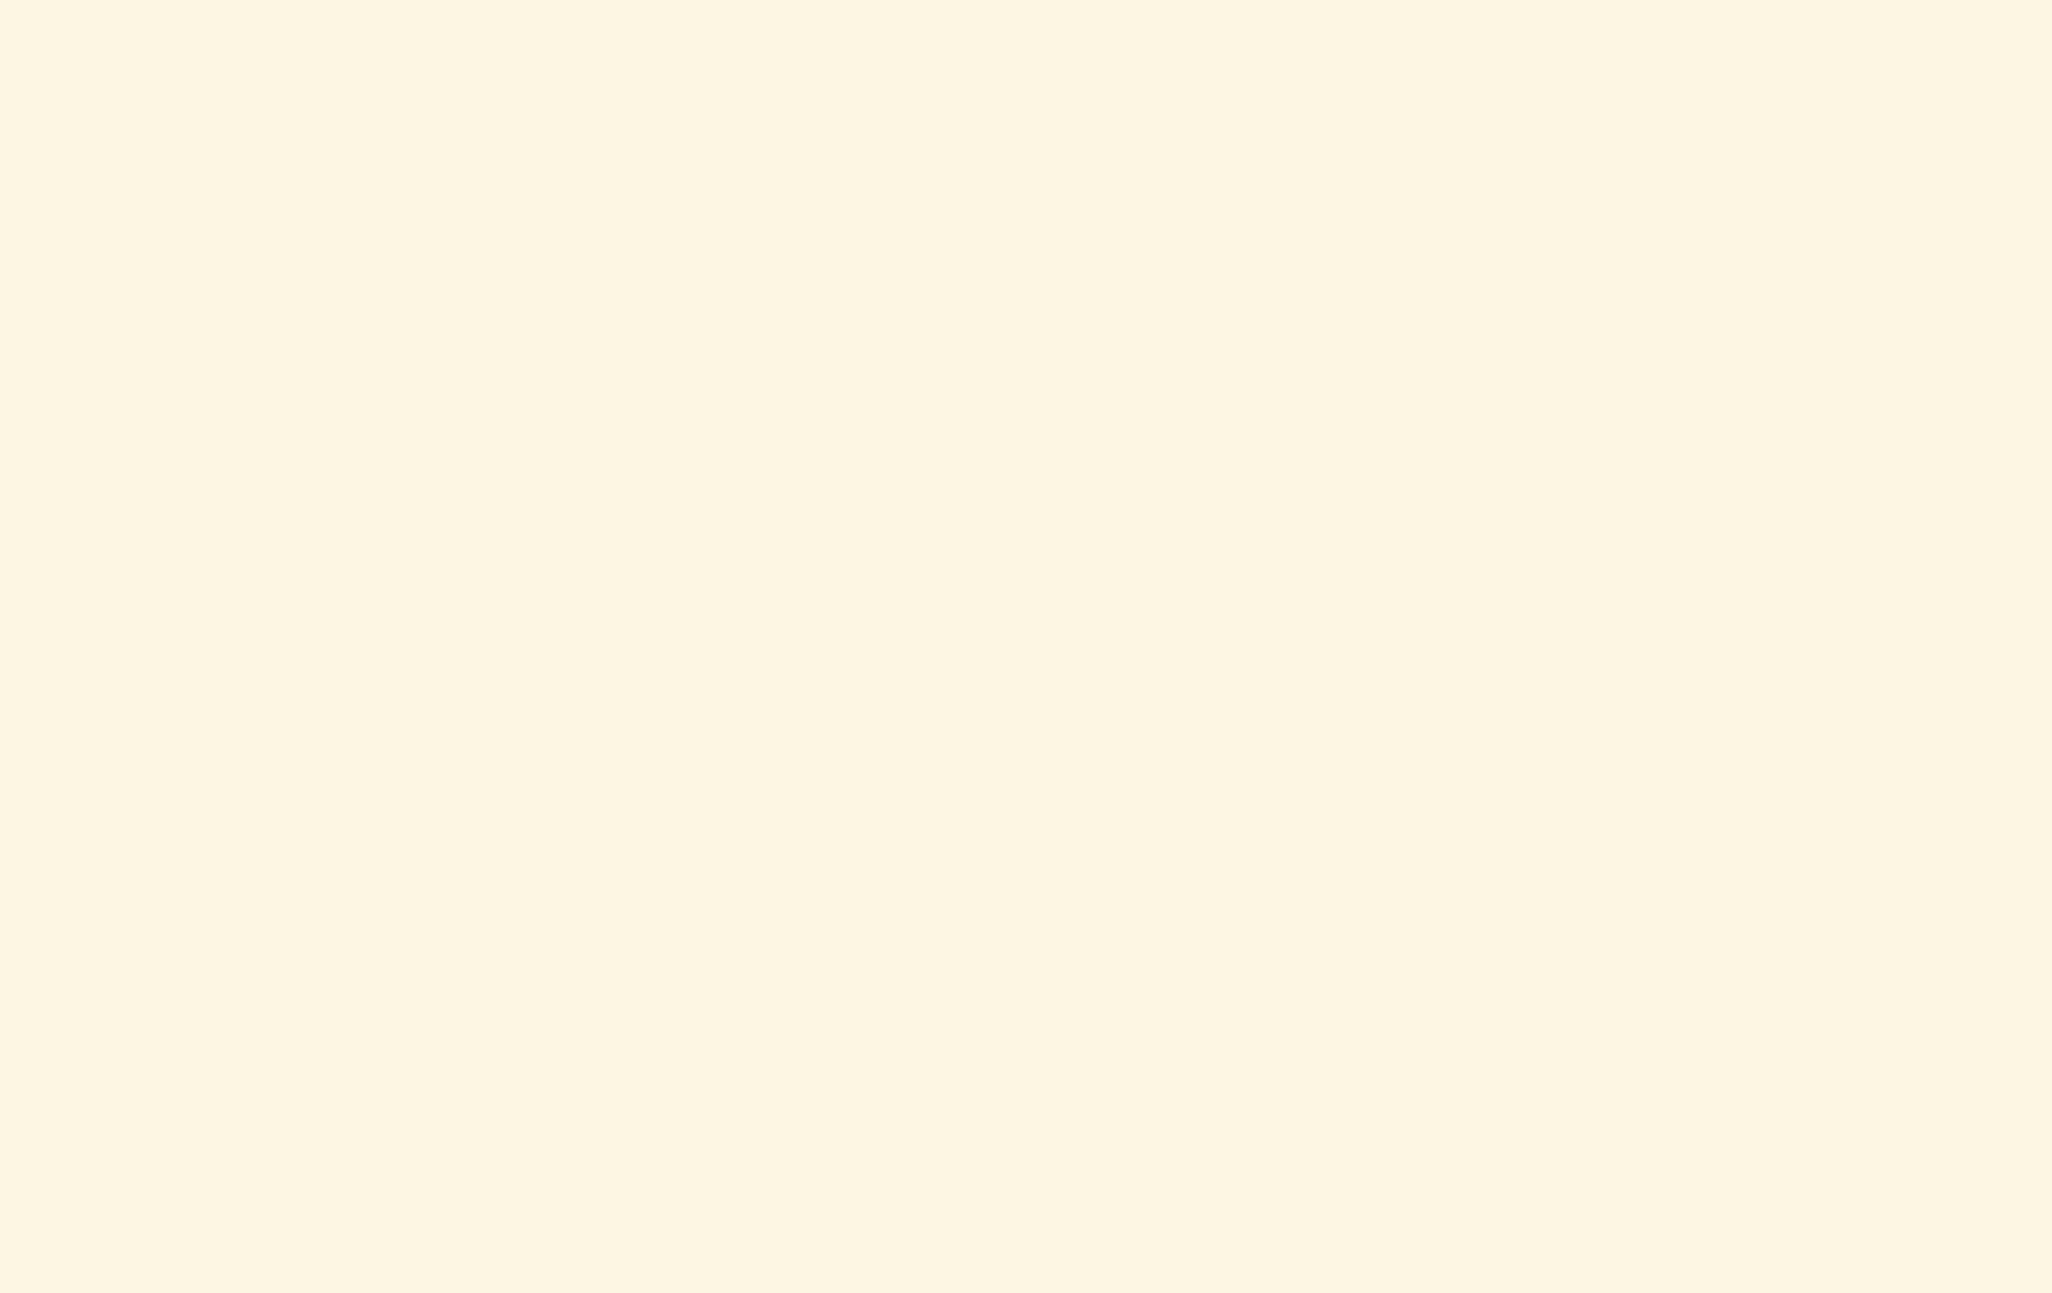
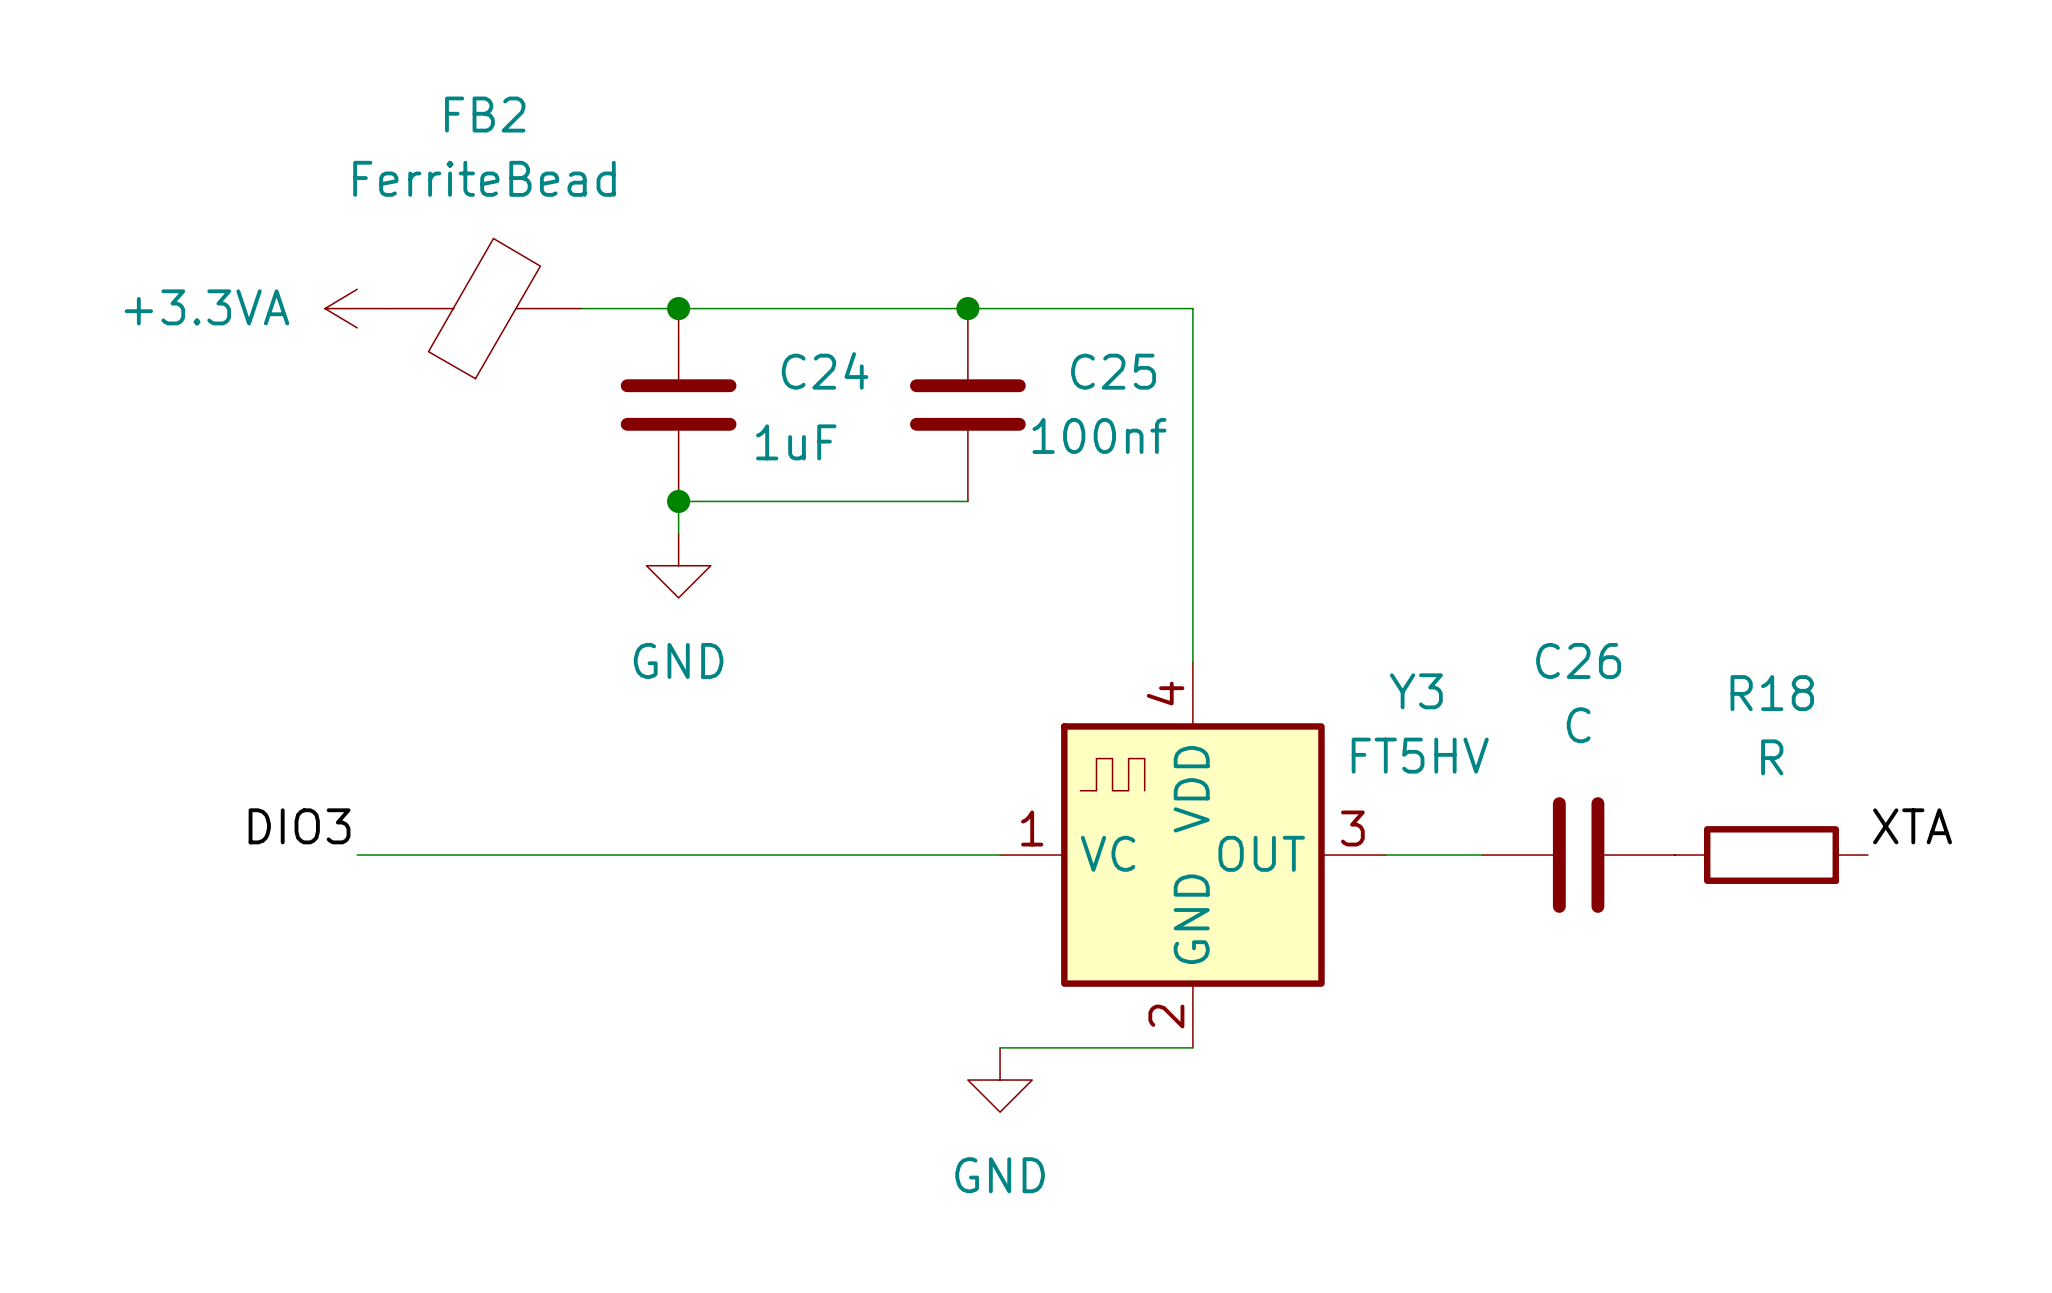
power symbol: none -> +3.3VA (357, 308)
FB2: none -> FerriteBead (485, 308)
wire: none -> (582, 308) (1192, 308) (1192, 662)
junction: none -> (678, 308)
junction: none -> (967, 308)
C24: none -> 1uF (678, 405)
C25: none -> 100nf (967, 405)
junction: none -> (678, 501)
wire: none -> (967, 501) (678, 501) (678, 533)
power symbol: none -> GND (678, 565)
label: none -> DIO3 (299, 826)
label: none -> XTA (1912, 826)
wire: none -> (357, 855) (1000, 855)
Y3: none -> FT5HV (1192, 855)
wire: none -> (1385, 855) (1482, 855)
C26: none -> C (1578, 855)
R18: none -> R (1771, 855)
wire: none -> (1000, 1047) (1192, 1047)
power symbol: none -> GND (1000, 1080)

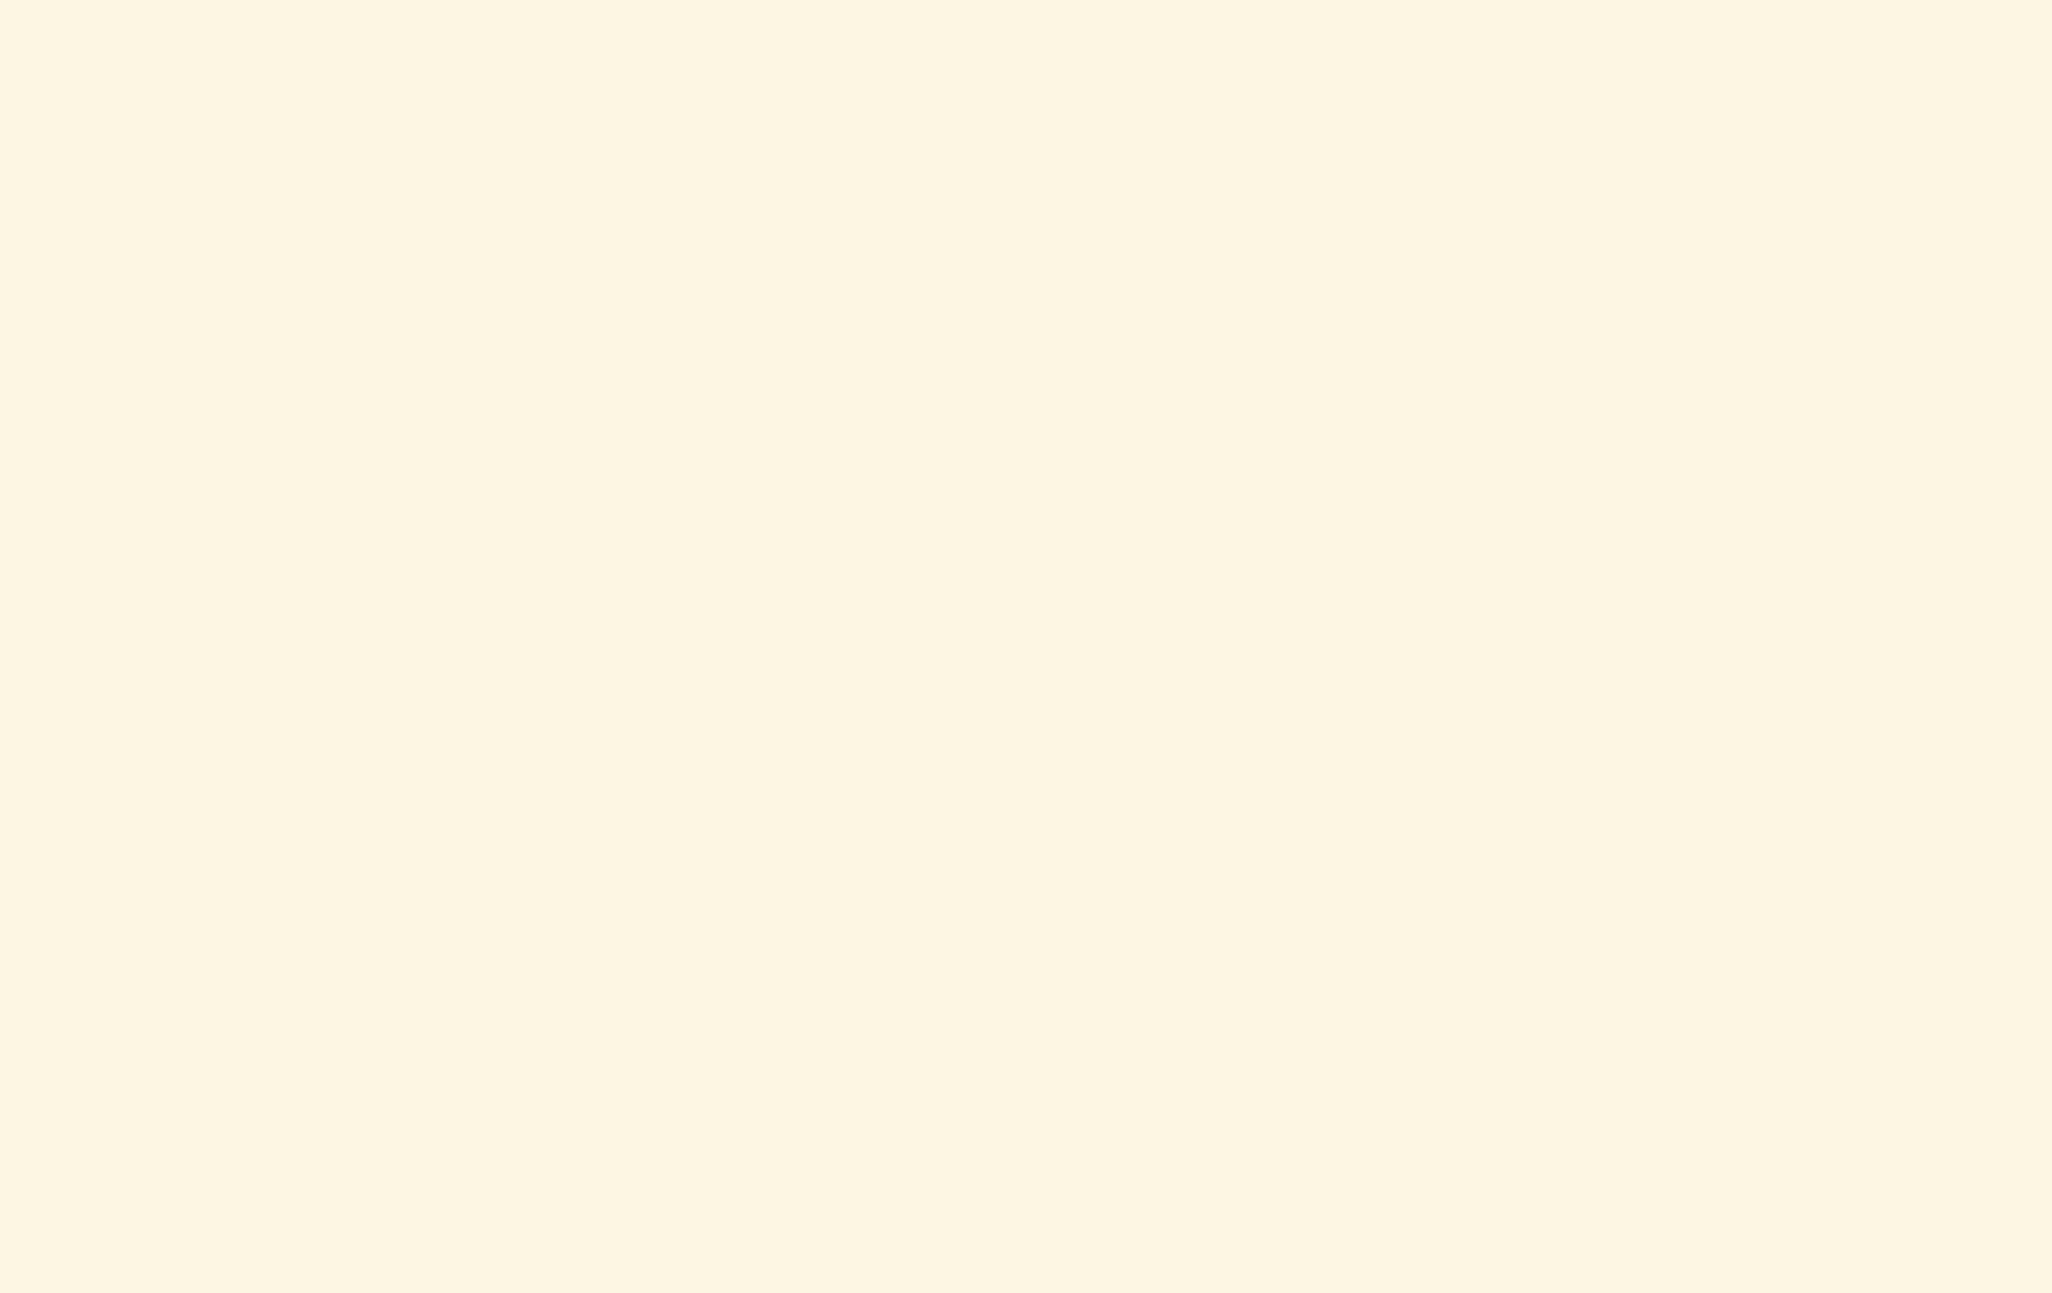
power symbol: +3.3VA (357, 308) -> none
FB2: FerriteBead (485, 308) -> none
wire: (582, 308) (1192, 308) (1192, 662) -> none
junction: (678, 308) -> none
junction: (967, 308) -> none
C24: 1uF (678, 405) -> none
C25: 100nf (967, 405) -> none
junction: (678, 501) -> none
wire: (967, 501) (678, 501) (678, 533) -> none
power symbol: GND (678, 565) -> none
label: DIO3 (299, 826) -> none
label: XTA (1912, 826) -> none
wire: (357, 855) (1000, 855) -> none
Y3: FT5HV (1192, 855) -> none
wire: (1385, 855) (1482, 855) -> none
C26: C (1578, 855) -> none
R18: R (1771, 855) -> none
wire: (1000, 1047) (1192, 1047) -> none
power symbol: GND (1000, 1080) -> none

